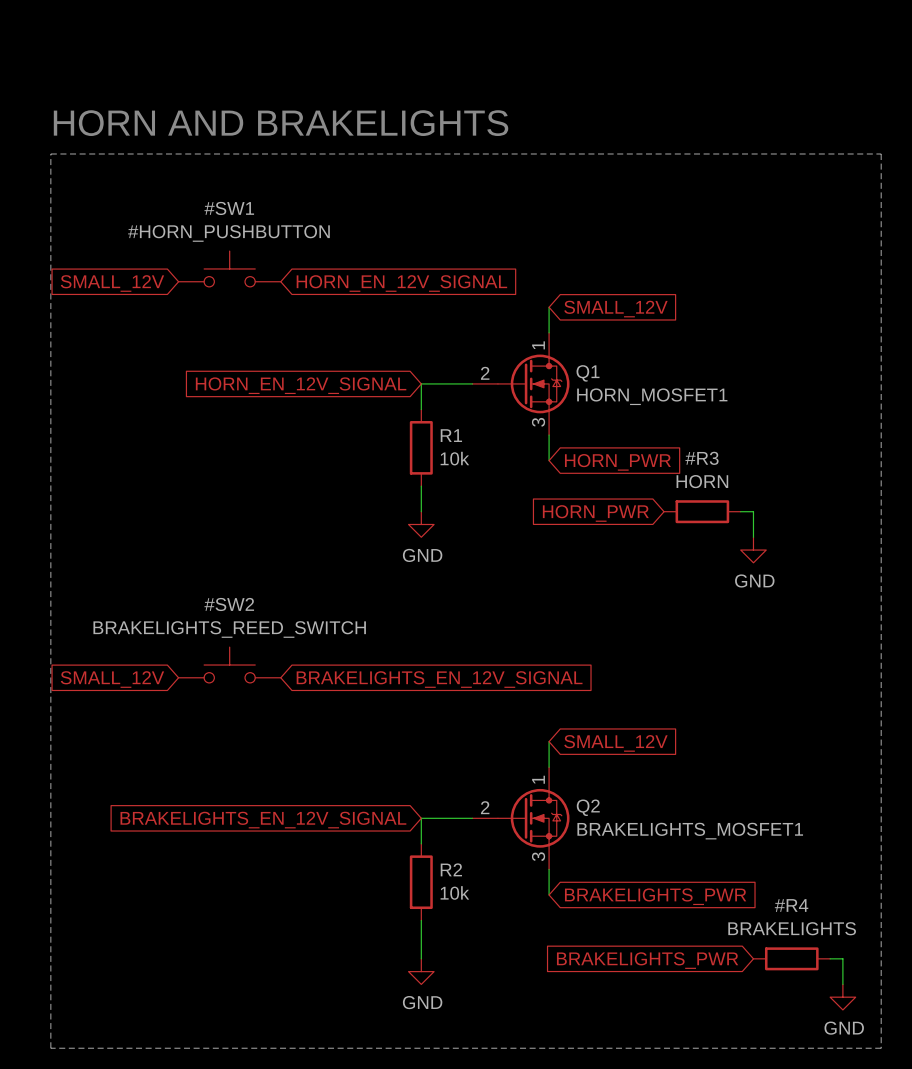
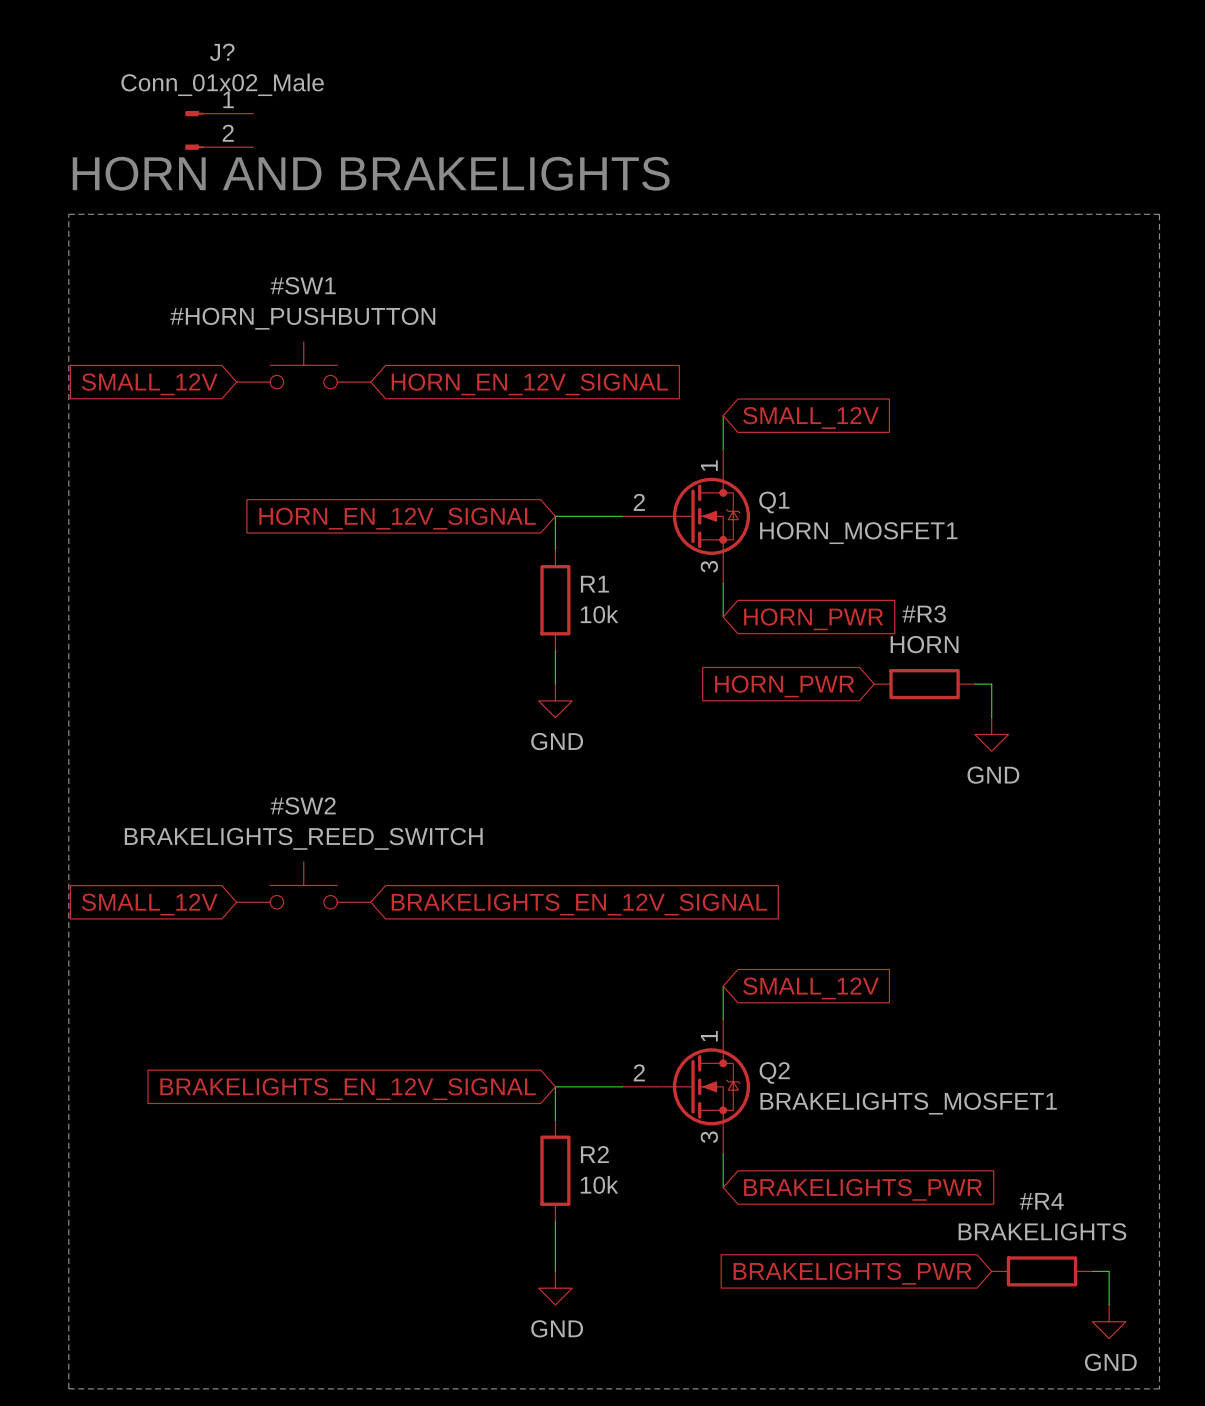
J?: none -> Conn_01x02_Male (219, 130)

